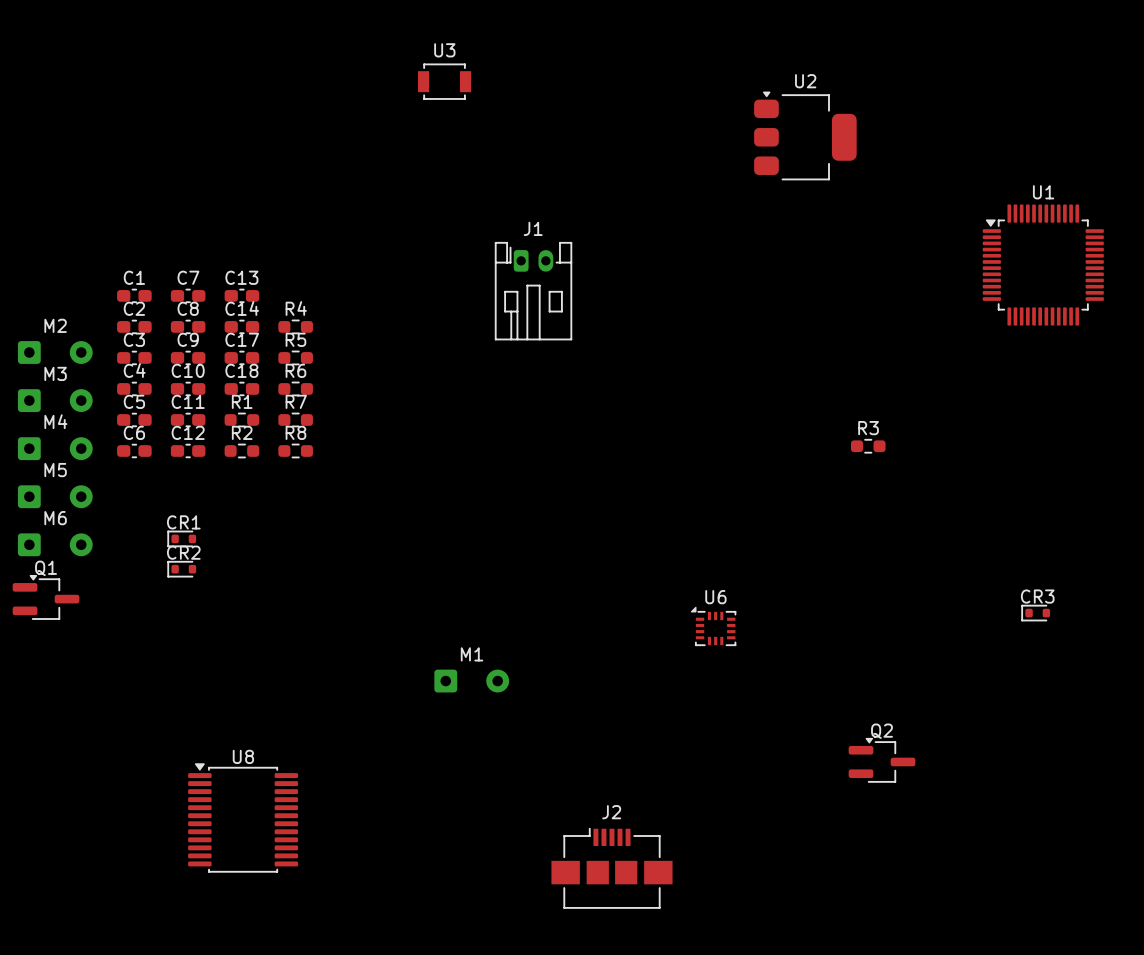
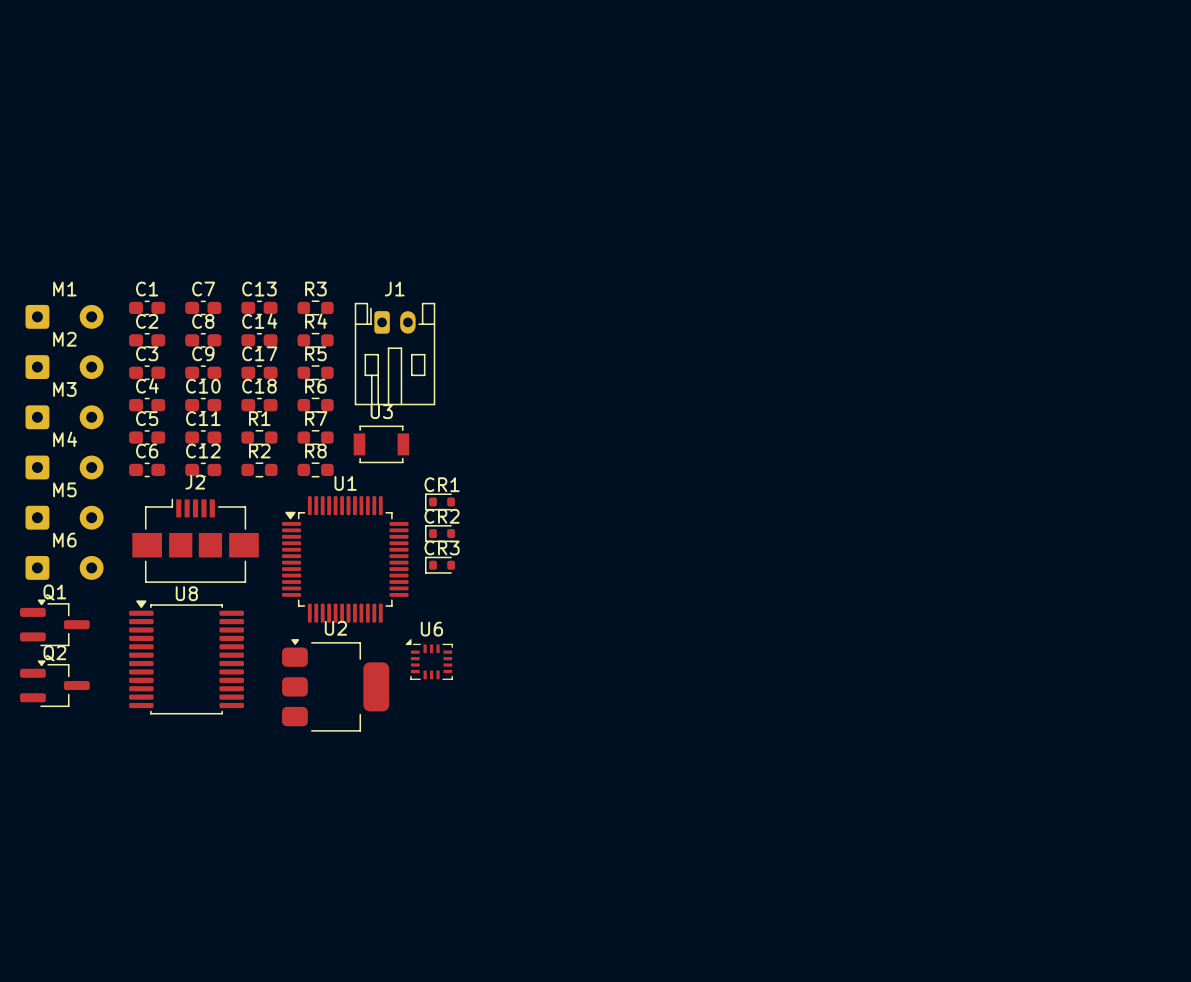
U3 position: (444, 81) -> (381, 444)
U2 position: (805, 135) -> (335, 685)
U1 position: (1043, 265) -> (345, 559)
J1 position: (533, 291) -> (395, 354)
R3 position: (868, 446) -> (315, 307)
CR1 position: (181, 538) -> (439, 501)
CR2 position: (181, 569) -> (439, 533)
CR3 position: (1035, 613) -> (439, 565)
U6 position: (713, 626) -> (429, 659)
M1 position: (471, 681) -> (64, 316)
Q2 position: (882, 760) -> (54, 683)
U8 position: (243, 817) -> (186, 657)
J2 position: (611, 868) -> (195, 540)

